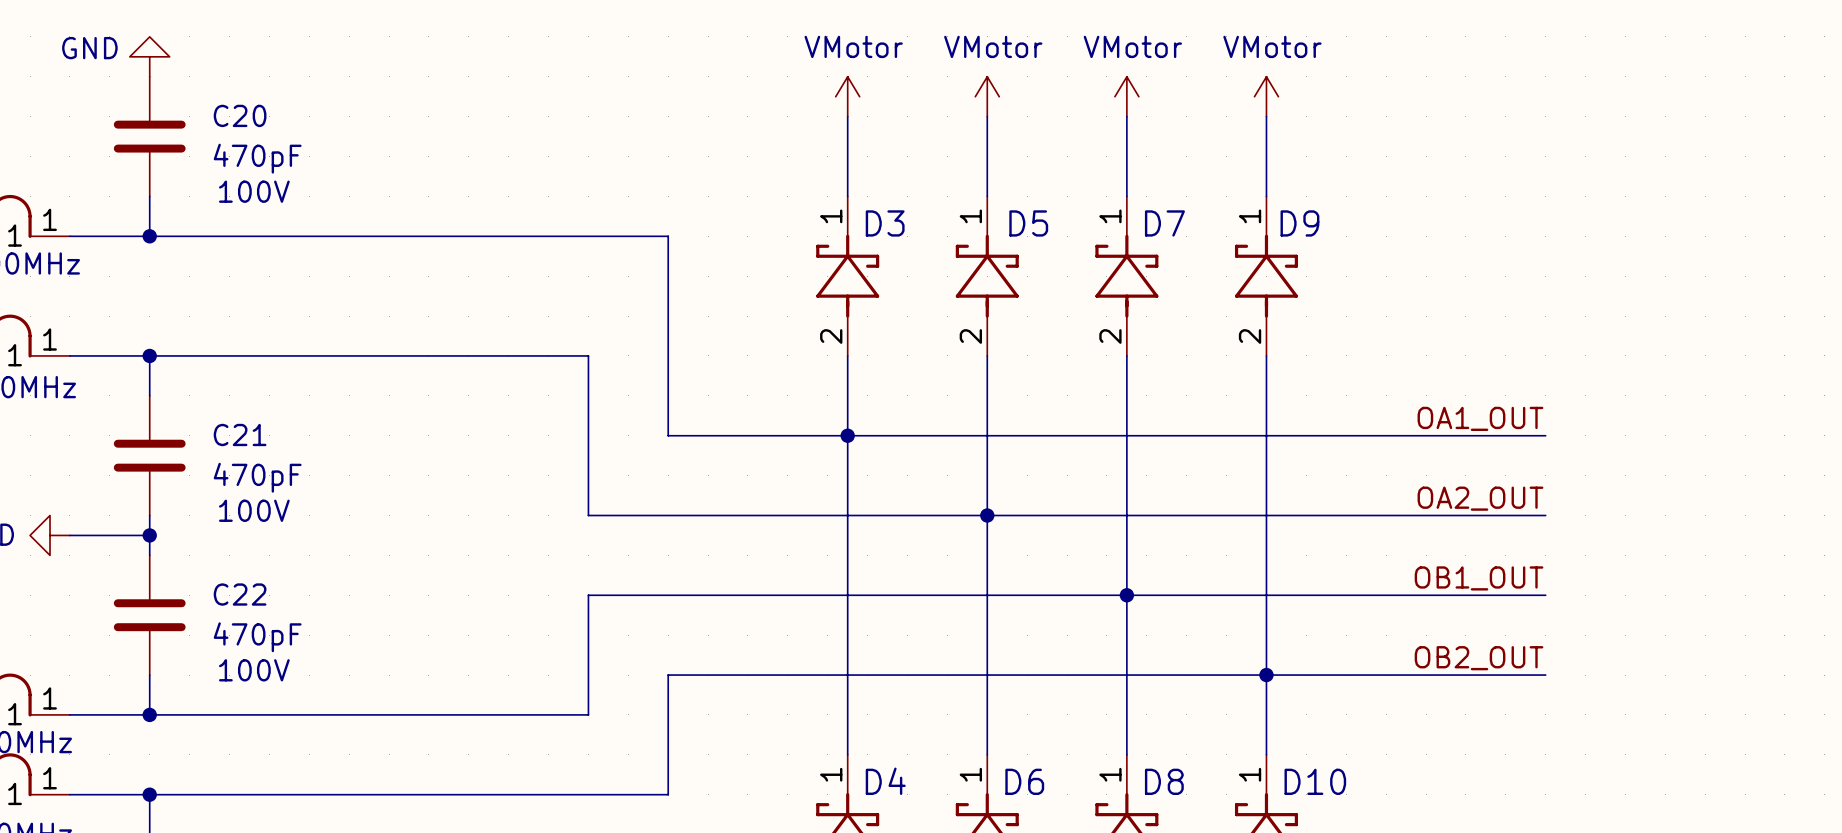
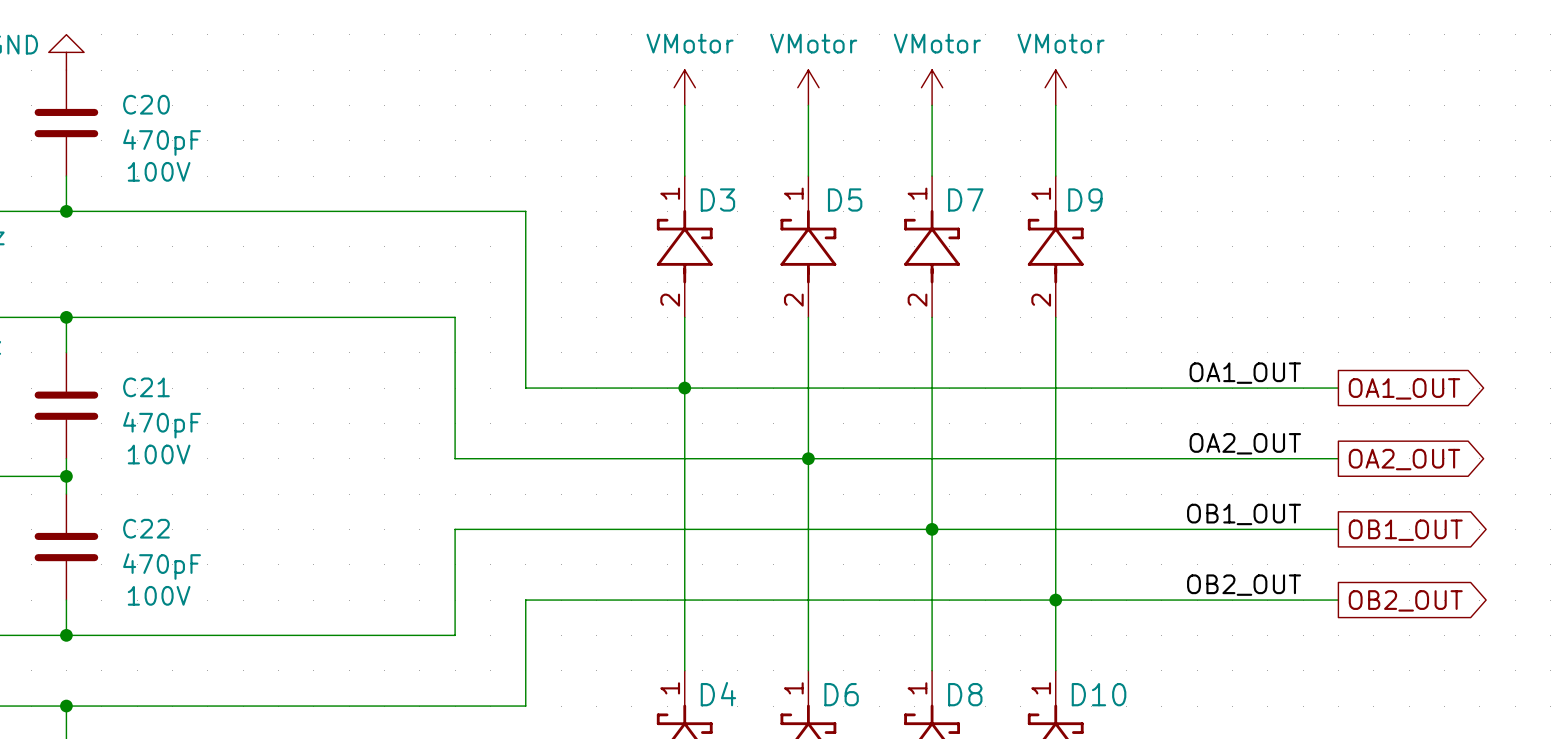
wire: none -> (1303, 388) (1338, 388)
global label: none -> OA1_OUT (1404, 388)
wire: none -> (1303, 458) (1338, 458)
global label: none -> OA2_OUT (1404, 459)
wire: none -> (1303, 529) (1338, 529)
global label: none -> OB1_OUT (1405, 530)
wire: none -> (1303, 600) (1338, 600)
global label: none -> OB2_OUT (1405, 600)

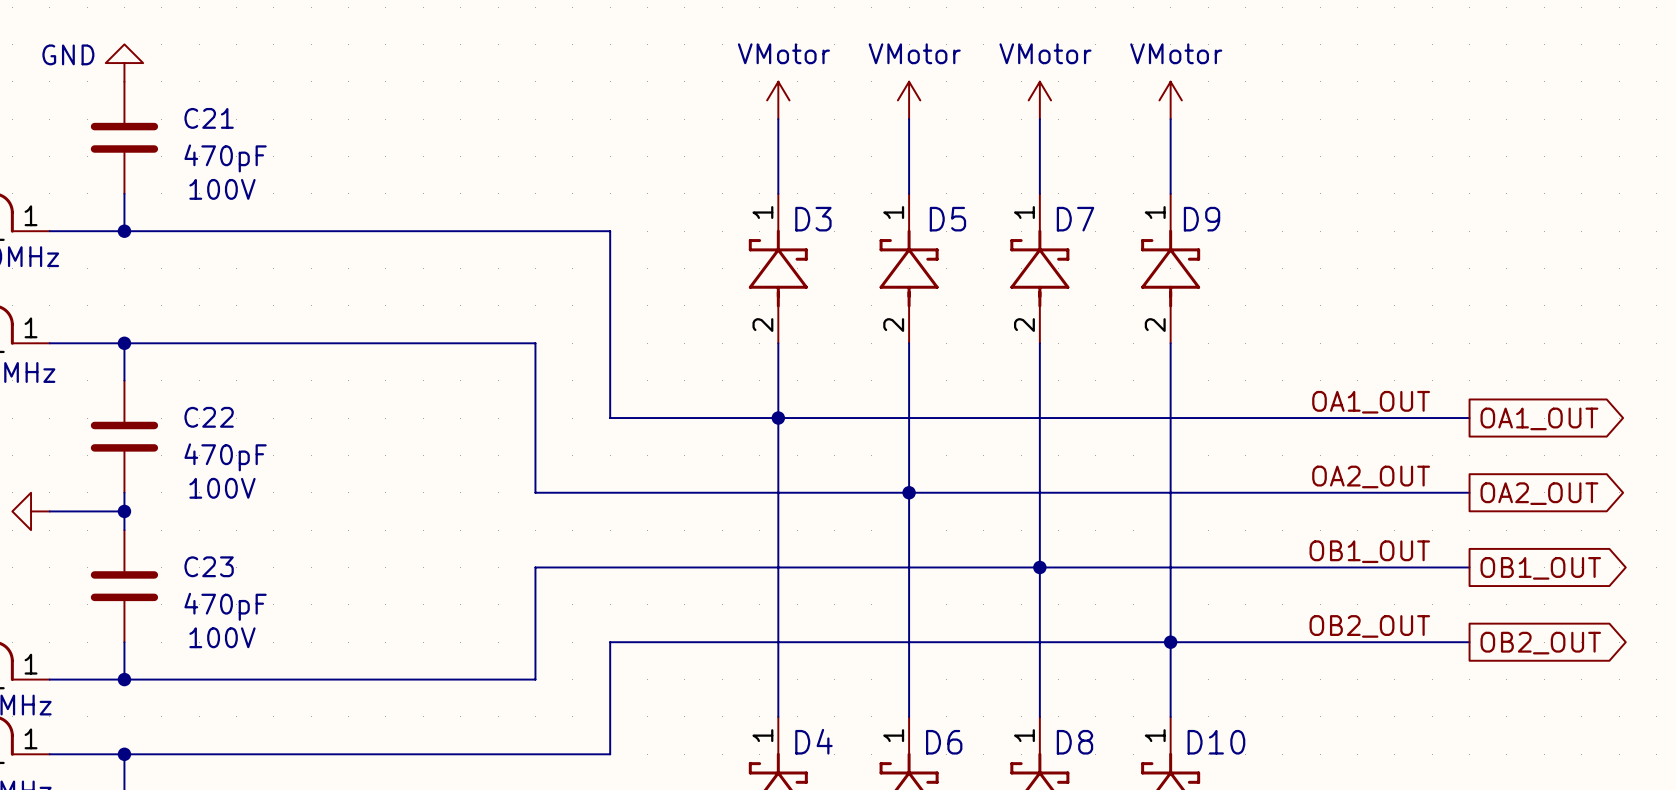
C20 name: C20 (146, 104) -> C21 (209, 118)
C21 name: C21 (146, 387) -> C22 (209, 417)
C22 name: C22 (146, 528) -> C23 (209, 566)

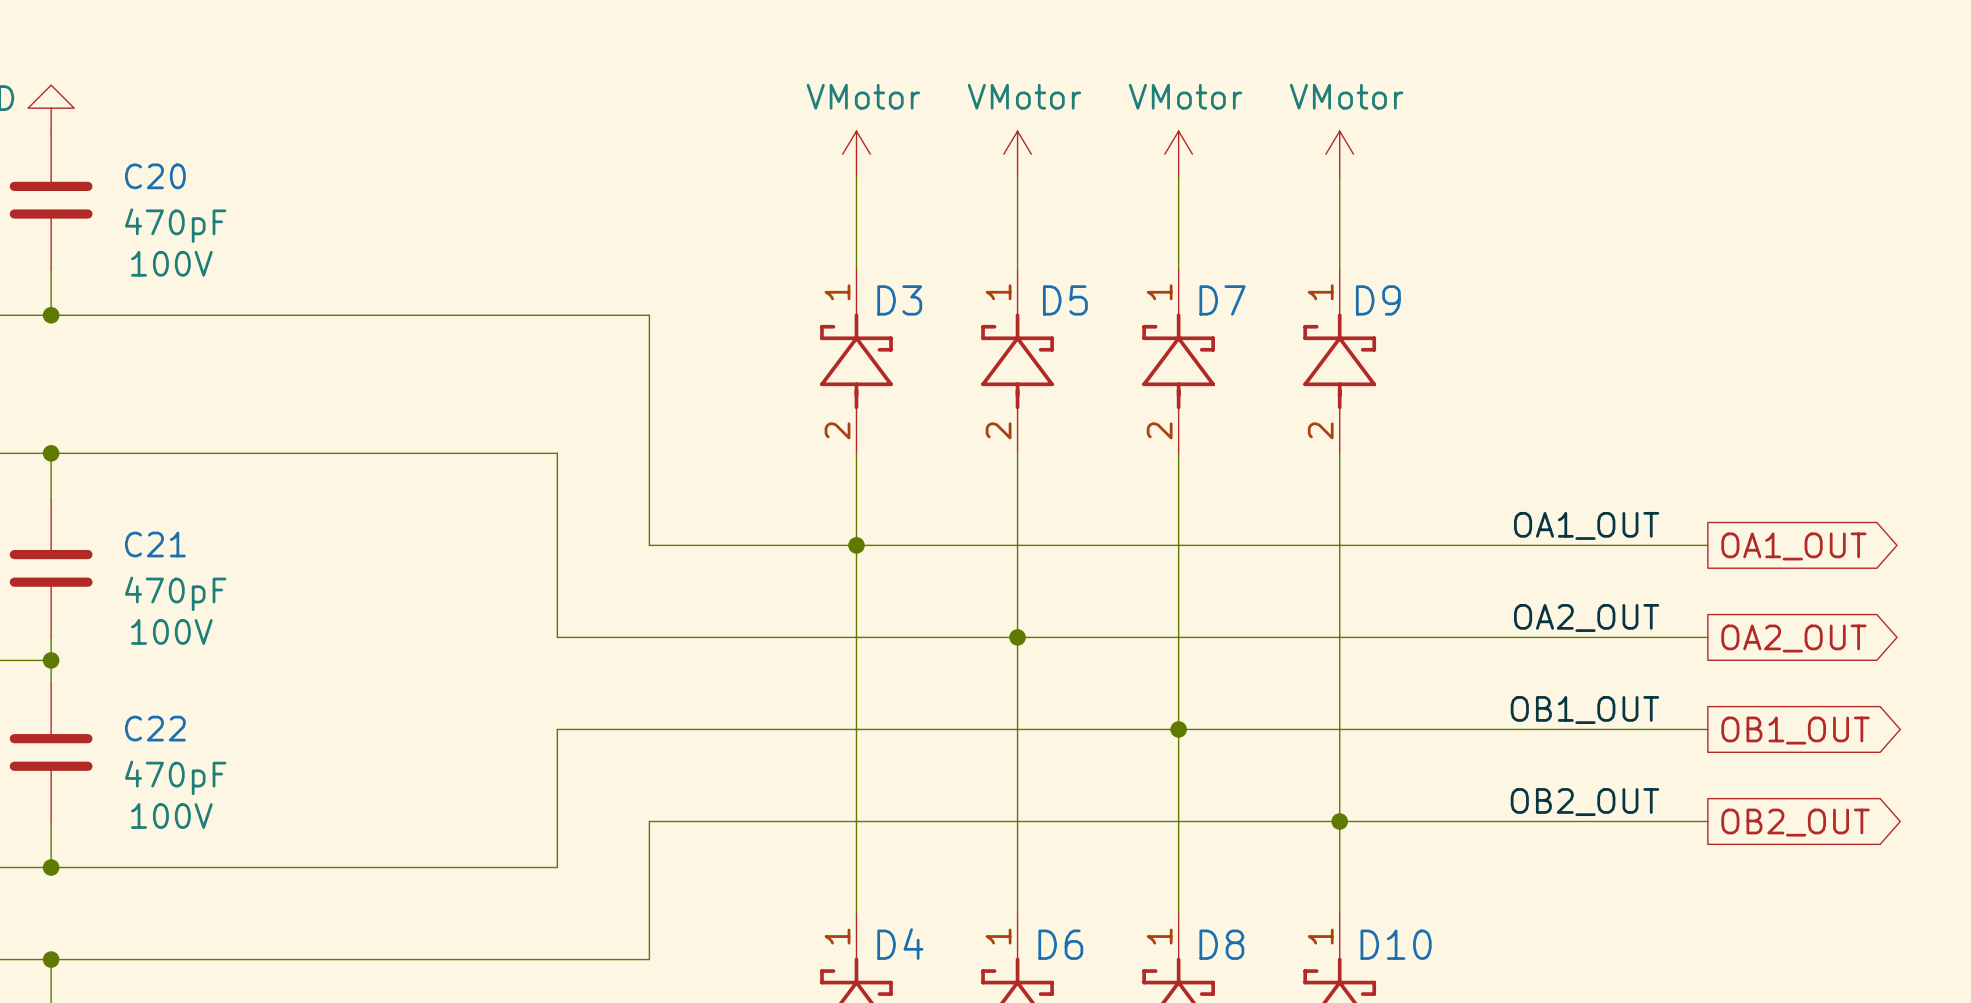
C21 name: C21 (209, 118) -> C20 (155, 176)
C22 name: C22 (209, 417) -> C21 (155, 544)
C23 name: C23 (209, 566) -> C22 (155, 728)

